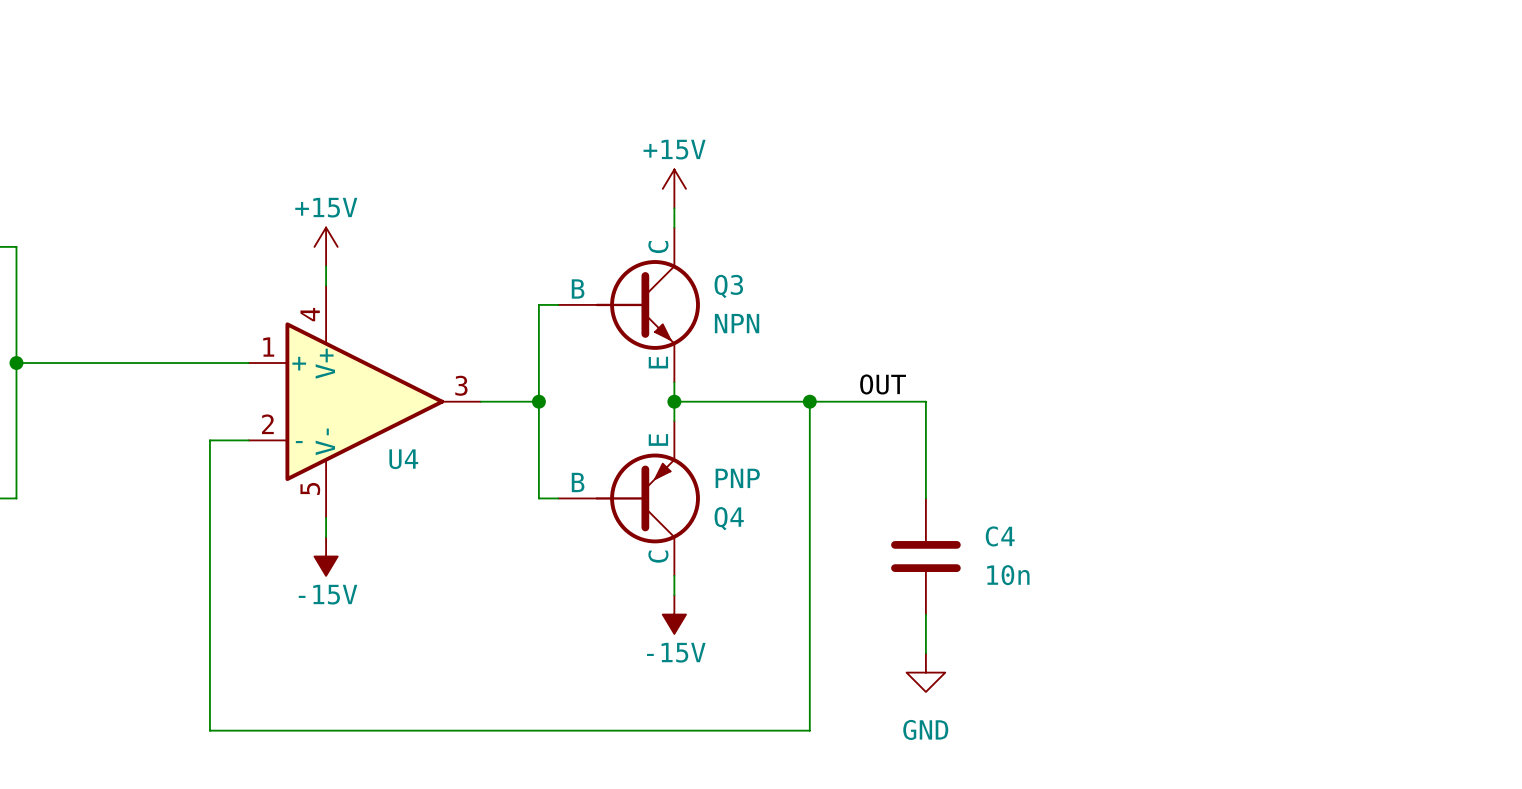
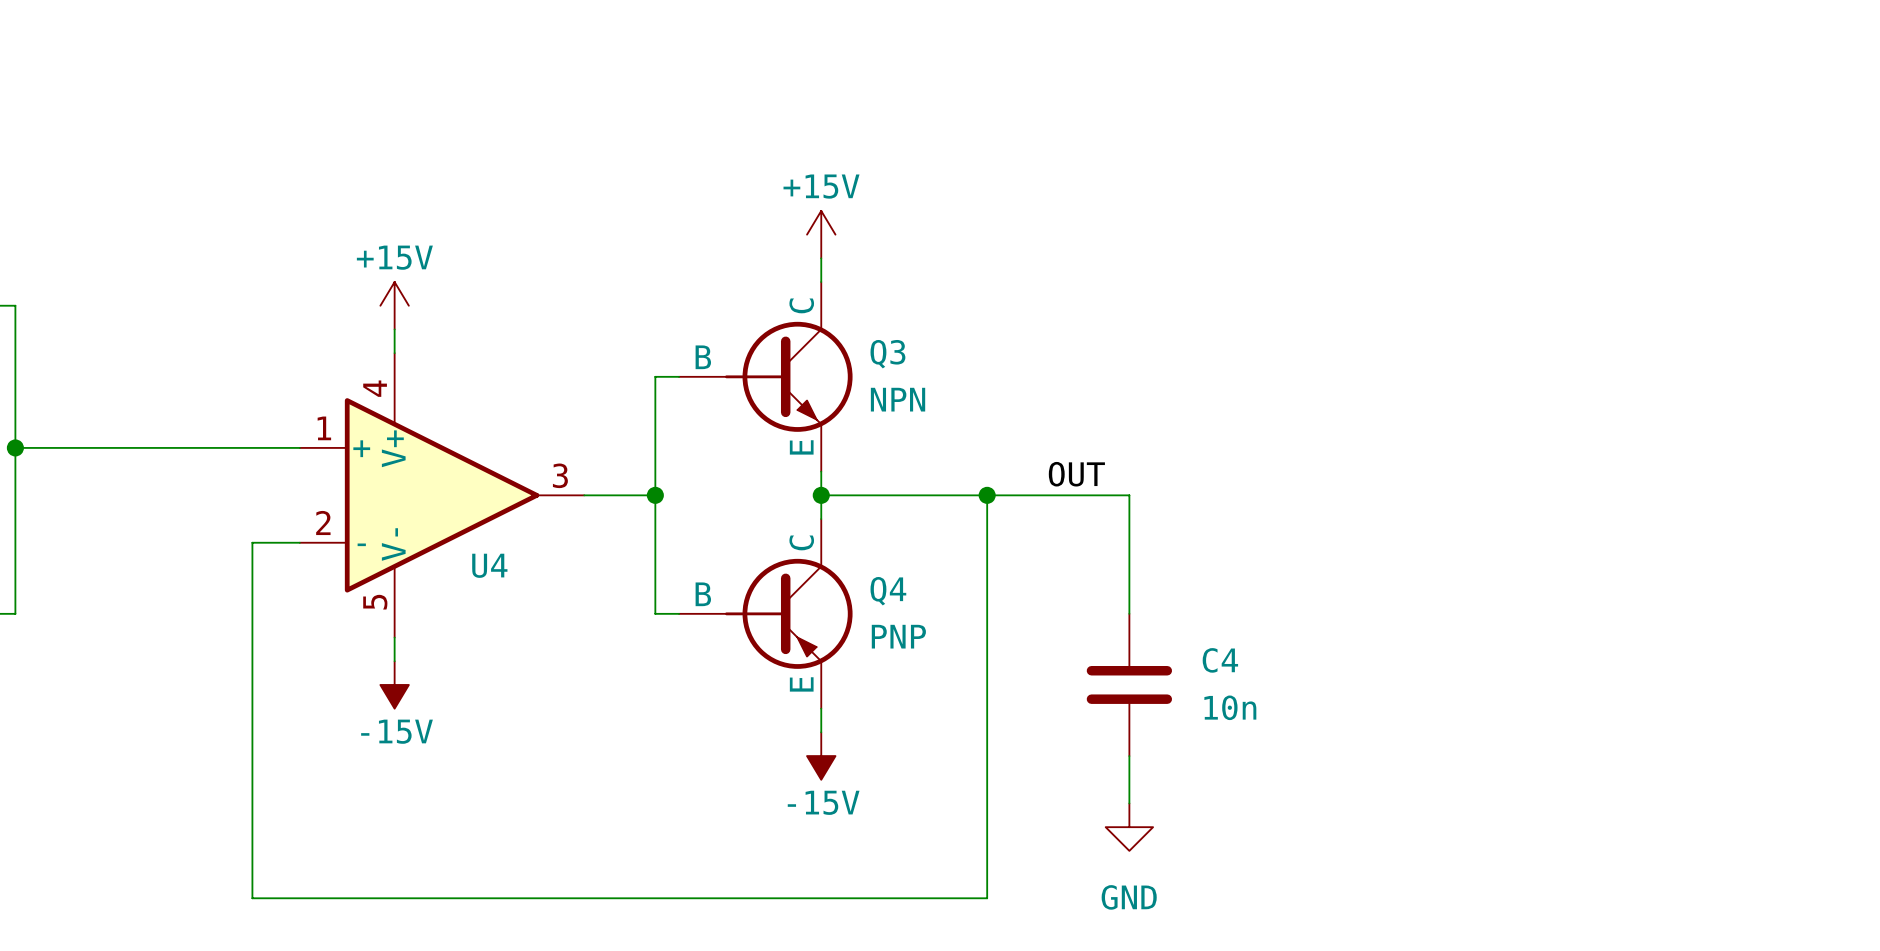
Q4 flip: as is (647, 498) -> up-down (788, 613)

